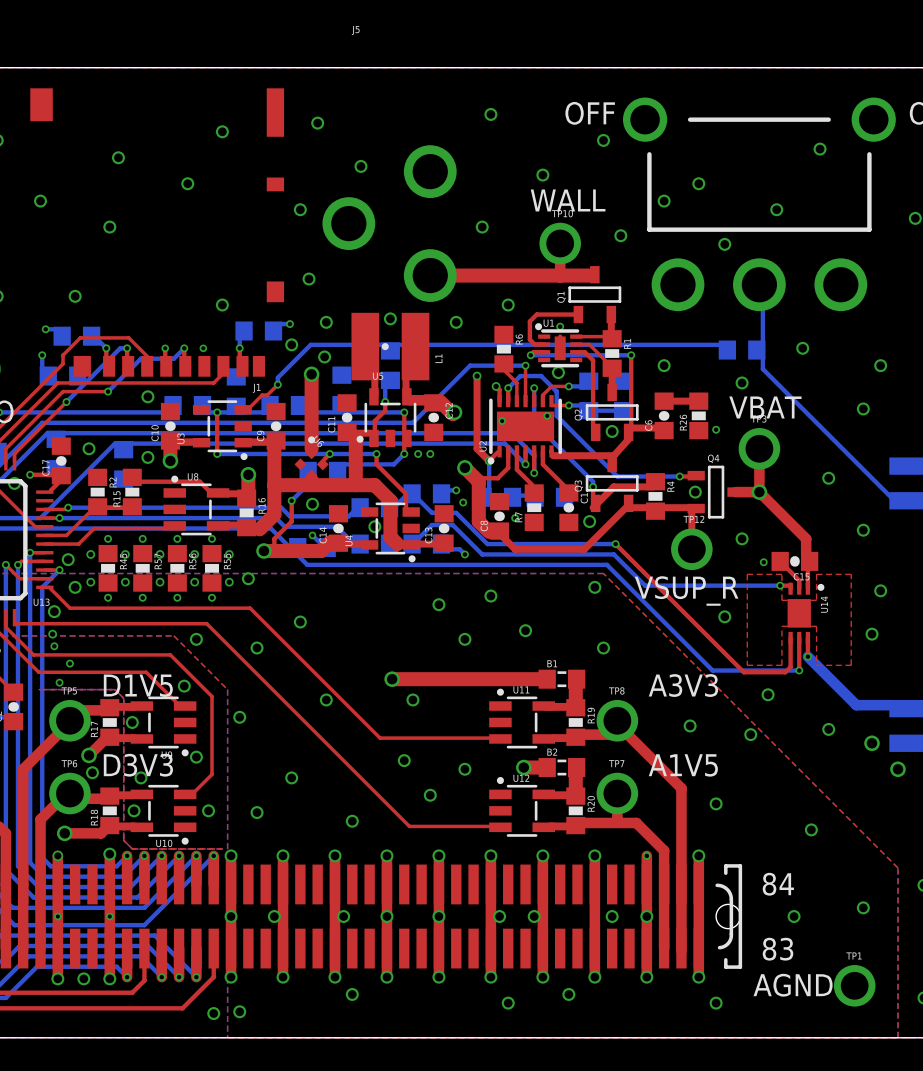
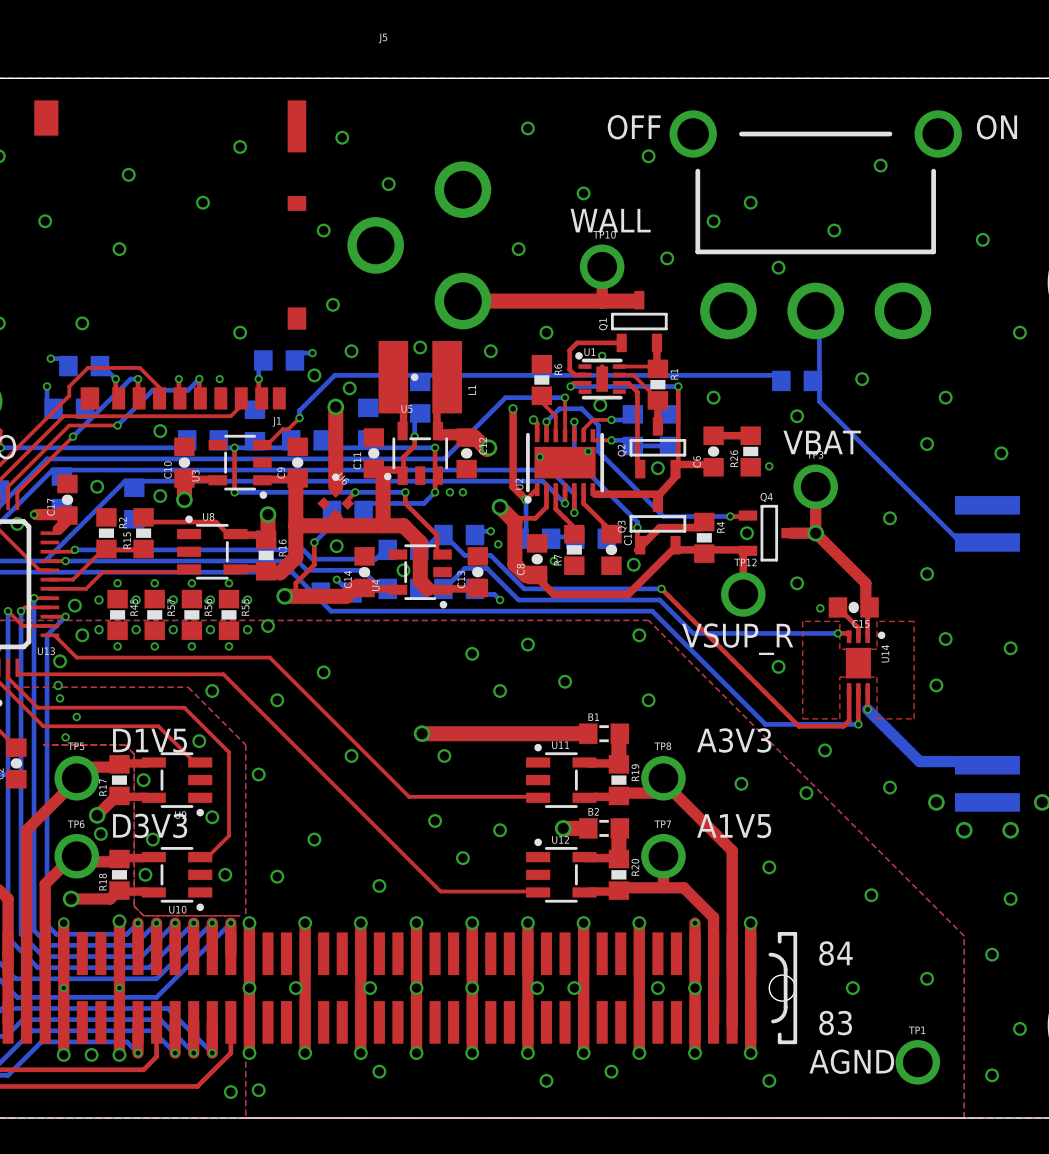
top track width: thin (31, 474) (54, 474) -> thick (35, 514) (60, 514)
top track width: thin (59, 481) (52, 488) -> thick (65, 522) (58, 529)

